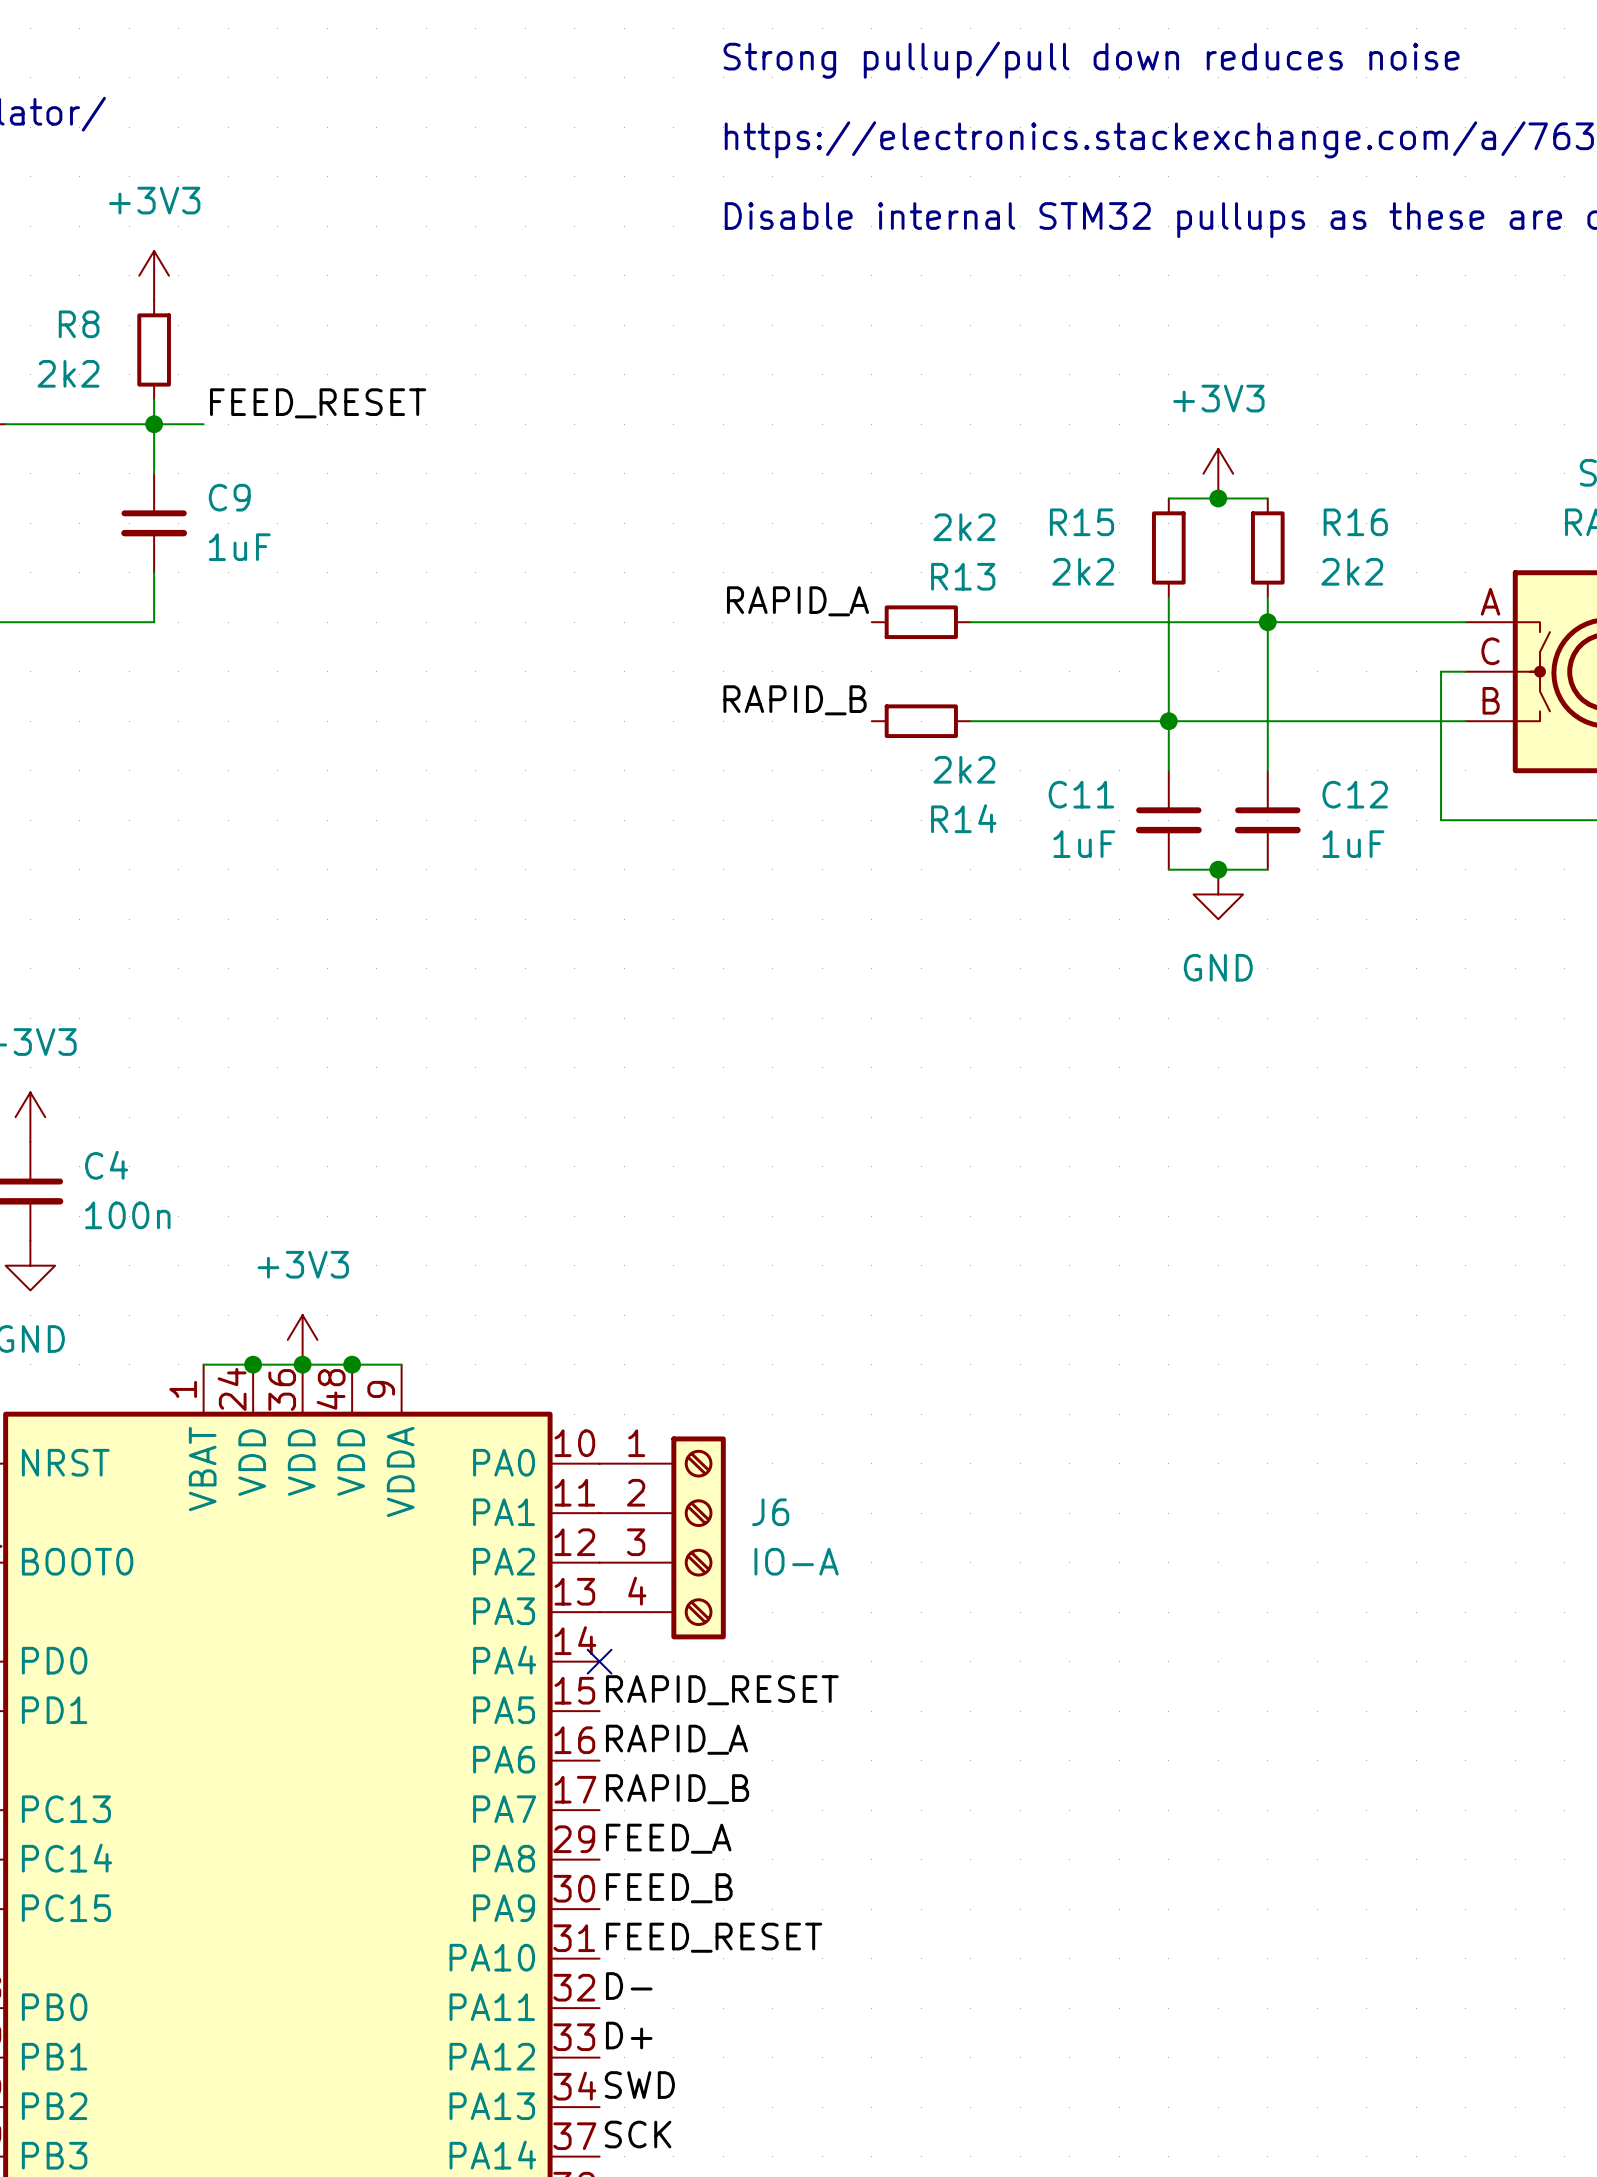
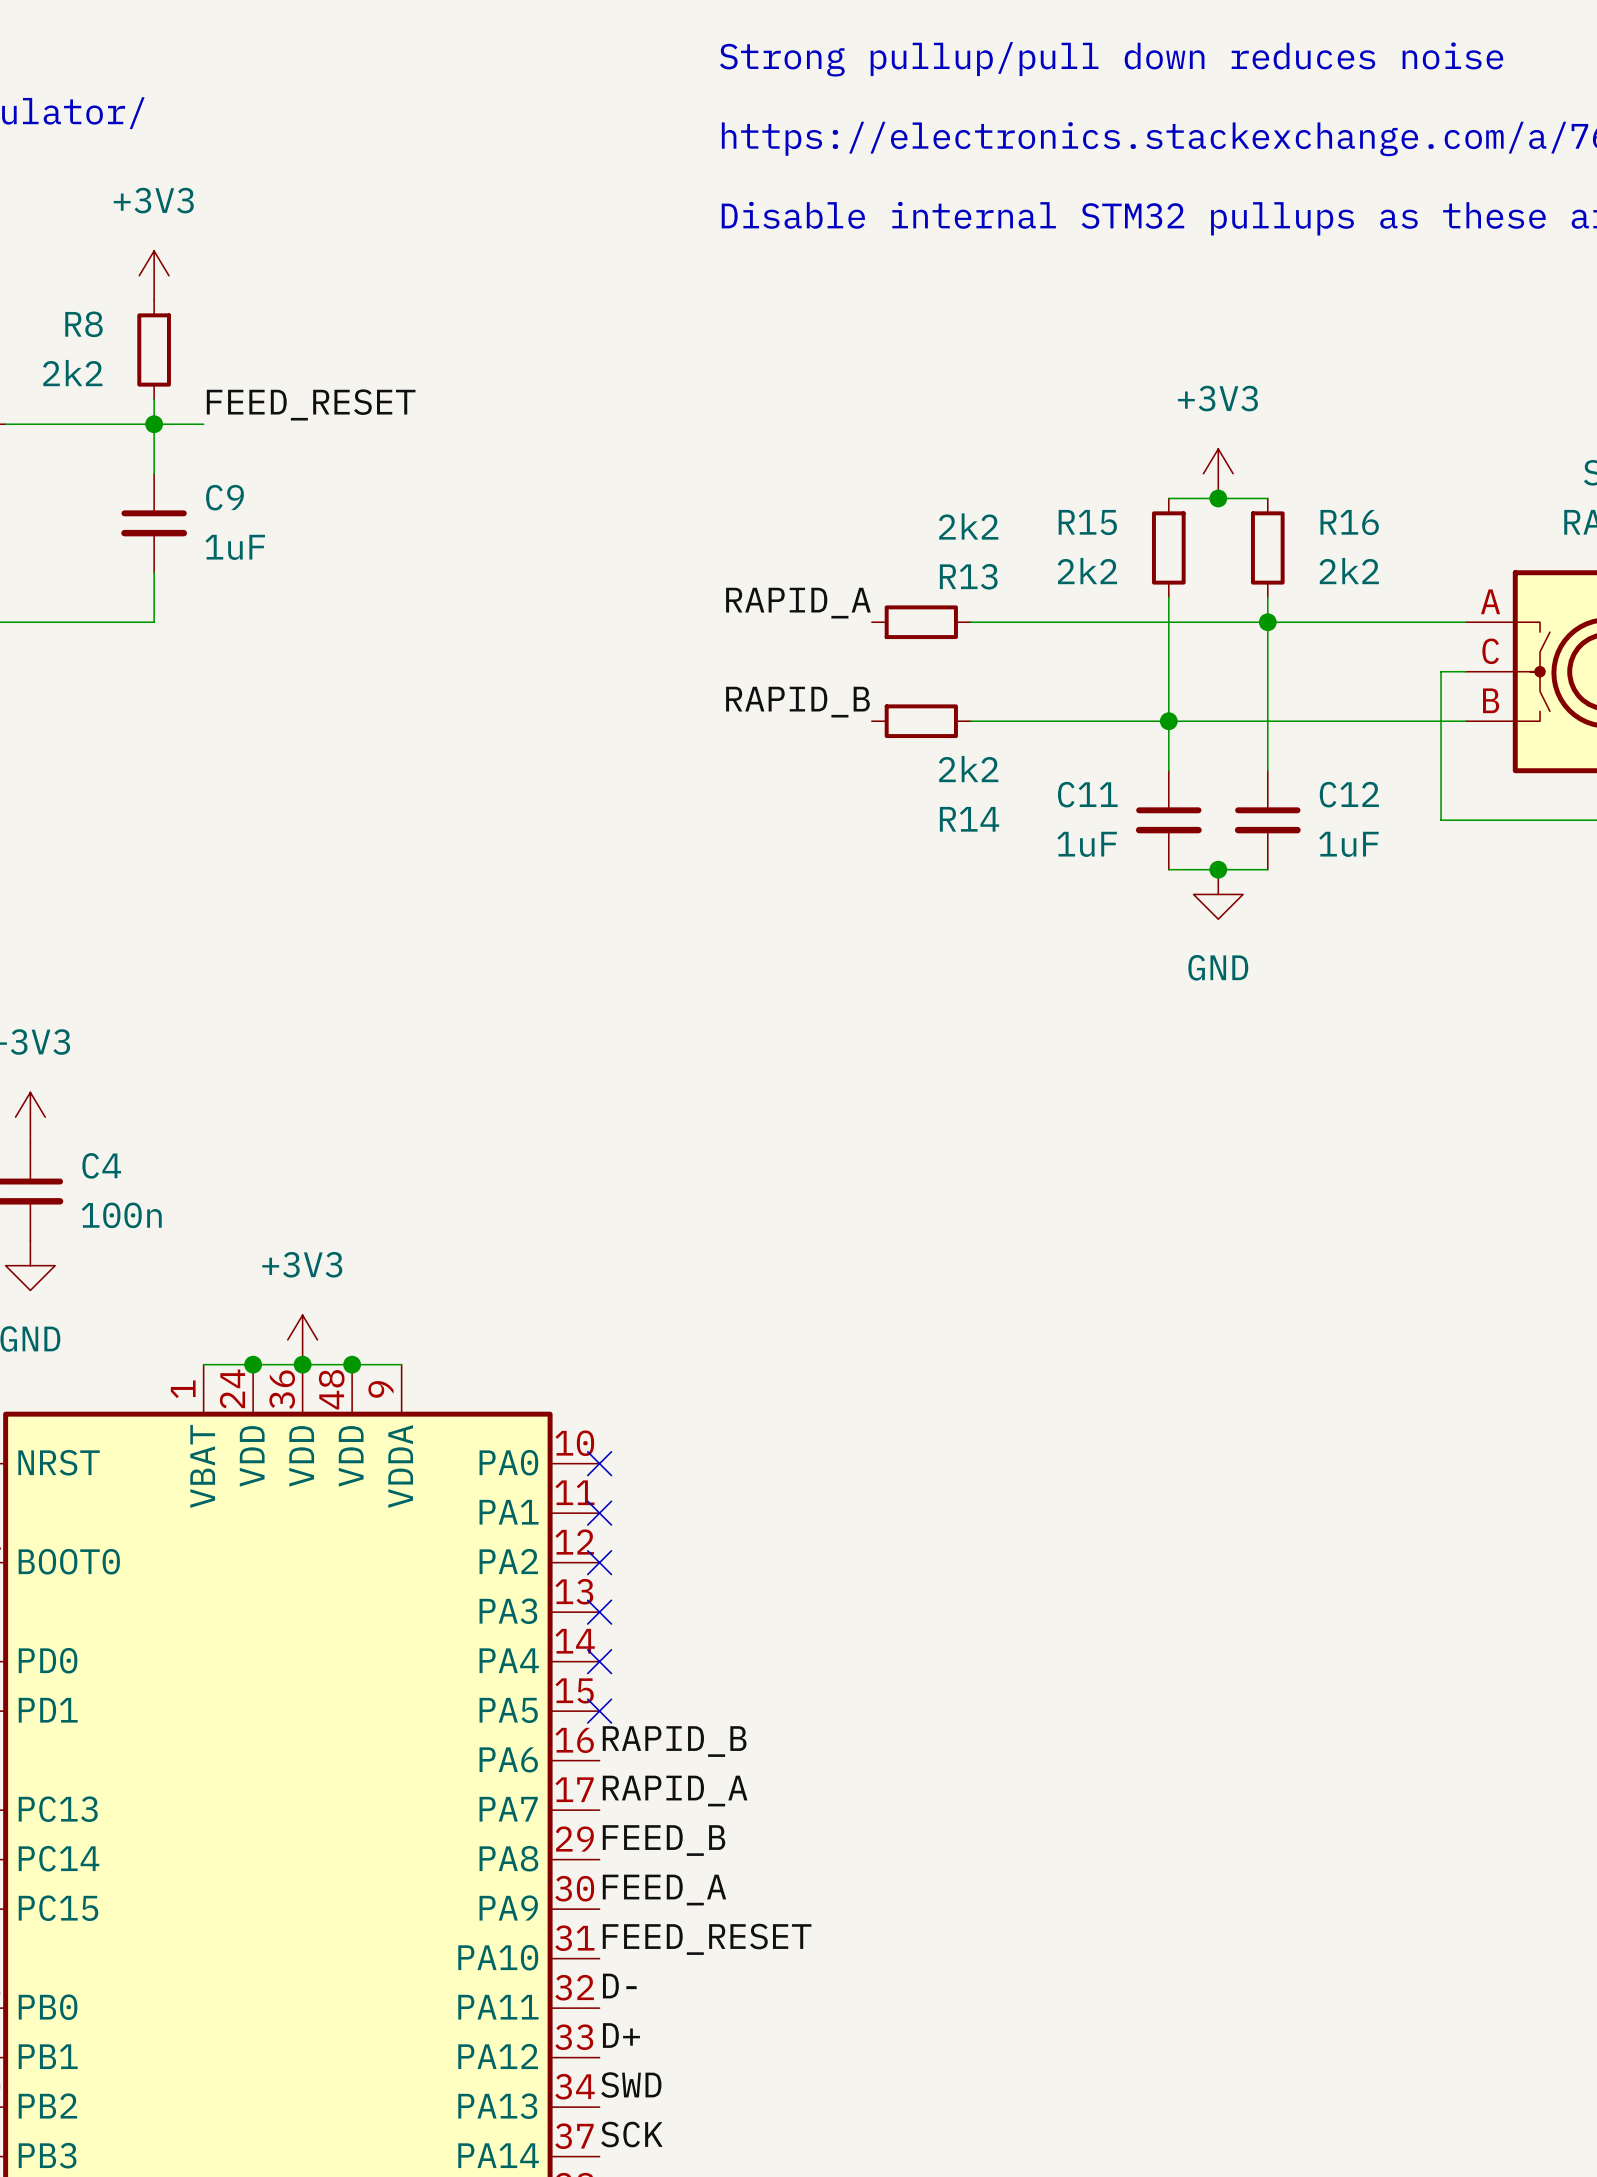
no-connect mark: none -> (599, 1463)
no-connect mark: none -> (599, 1513)
J6: IO-A (662, 1537) -> none
no-connect mark: none -> (599, 1562)
no-connect mark: none -> (599, 1612)
label: RAPID_RESET (722, 1690) -> none
no-connect mark: none -> (599, 1711)
label: RAPID_A (676, 1739) -> RAPID_B (674, 1741)
label: RAPID_B (677, 1789) -> RAPID_A (675, 1791)
label: FEED_A (668, 1838) -> FEED_B (664, 1840)
label: FEED_B (669, 1888) -> FEED_A (664, 1890)

